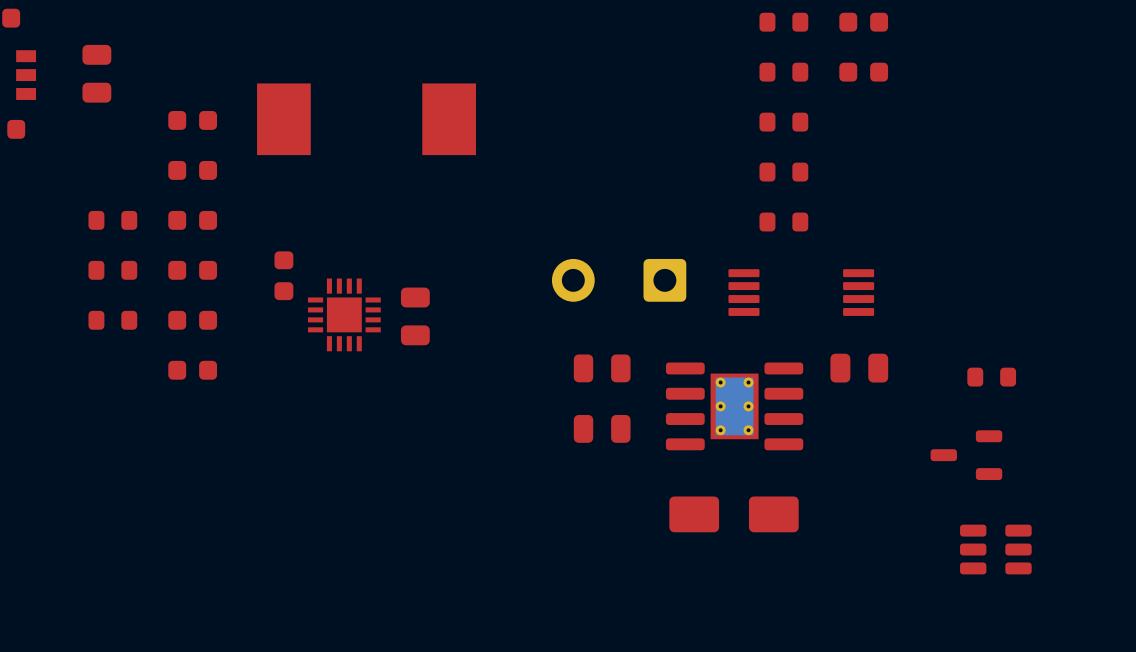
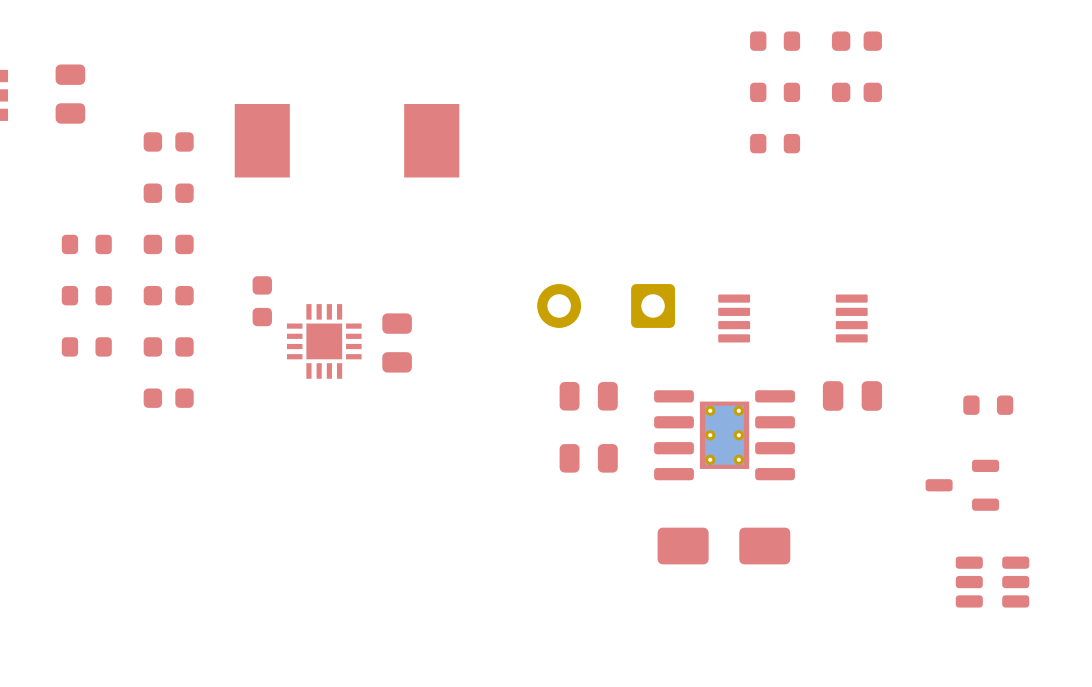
part: (783, 172) -> none
part: (783, 222) -> none

